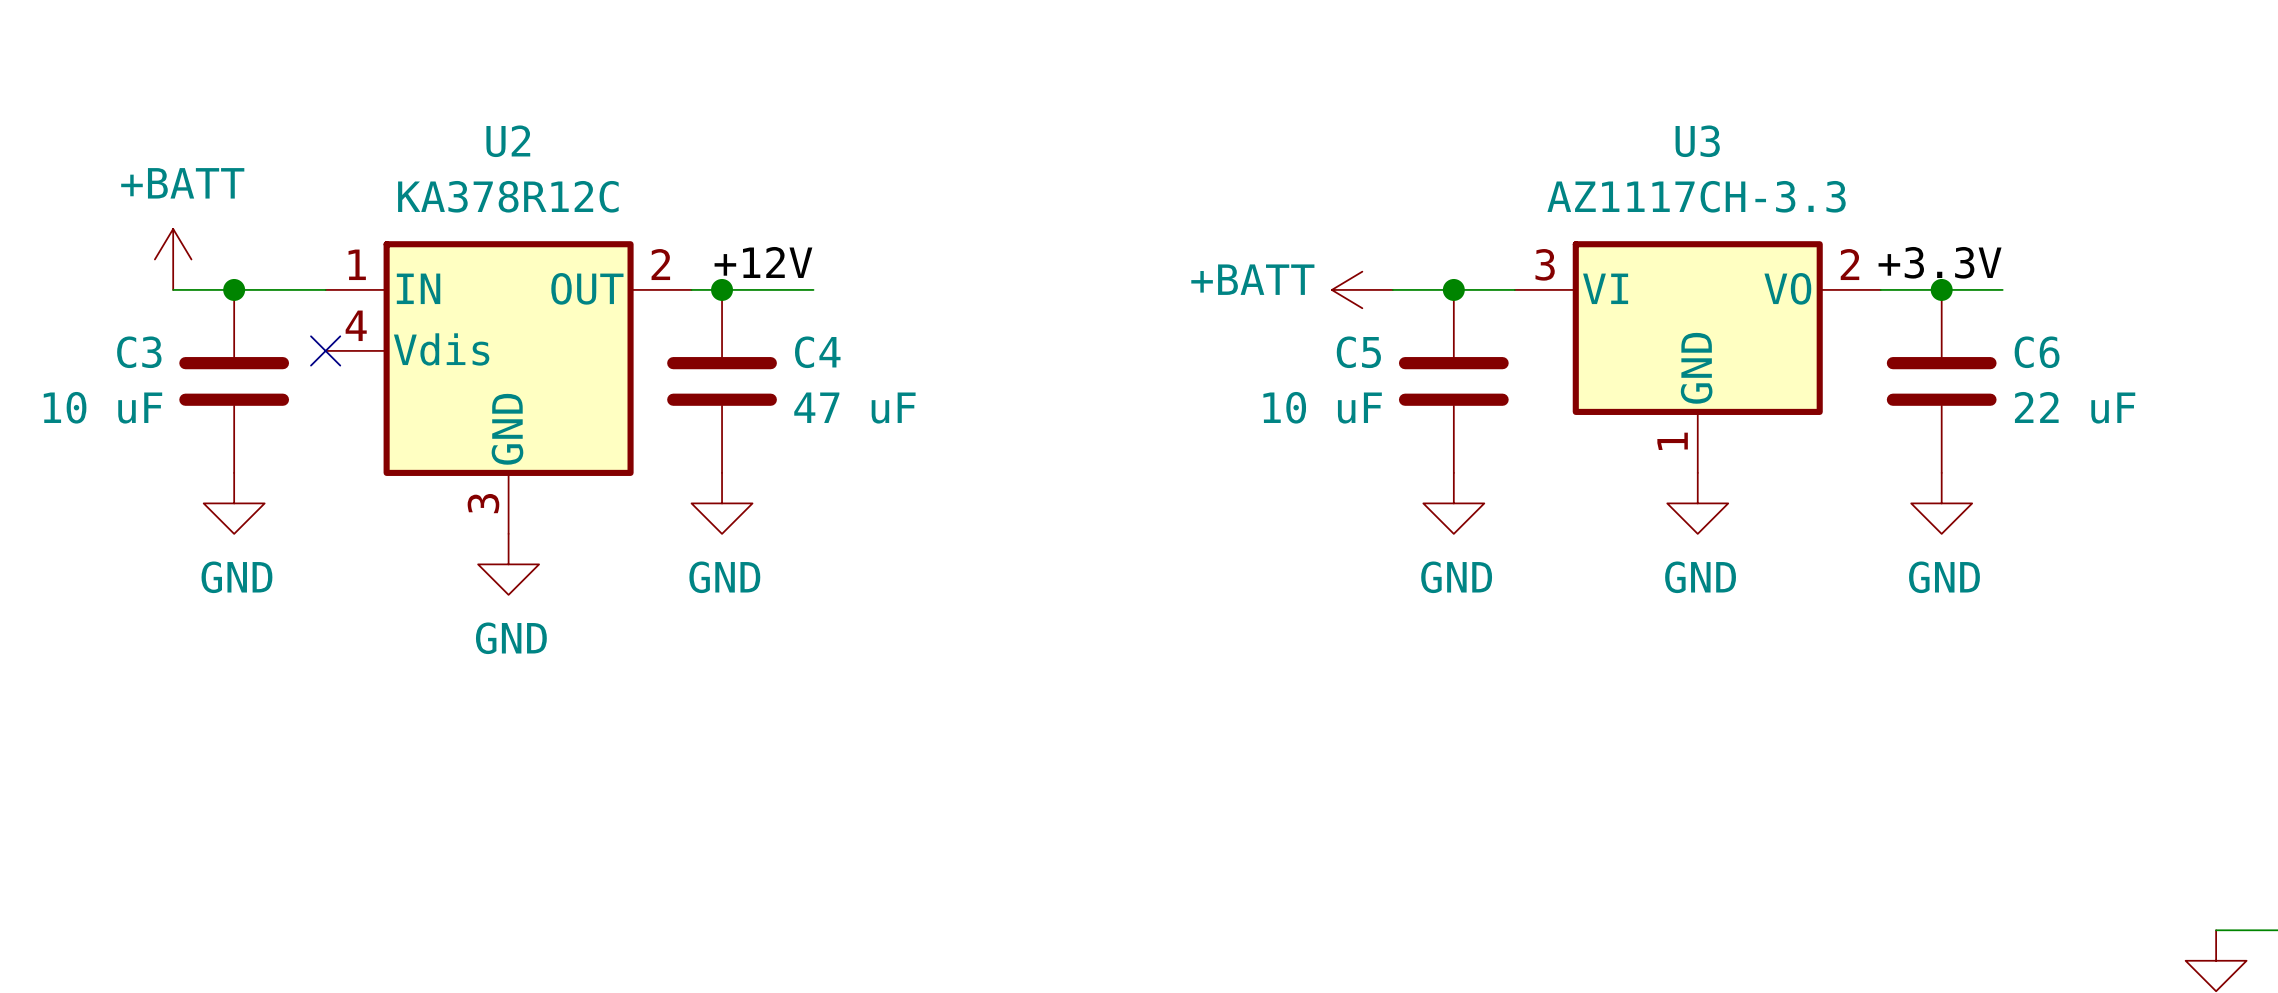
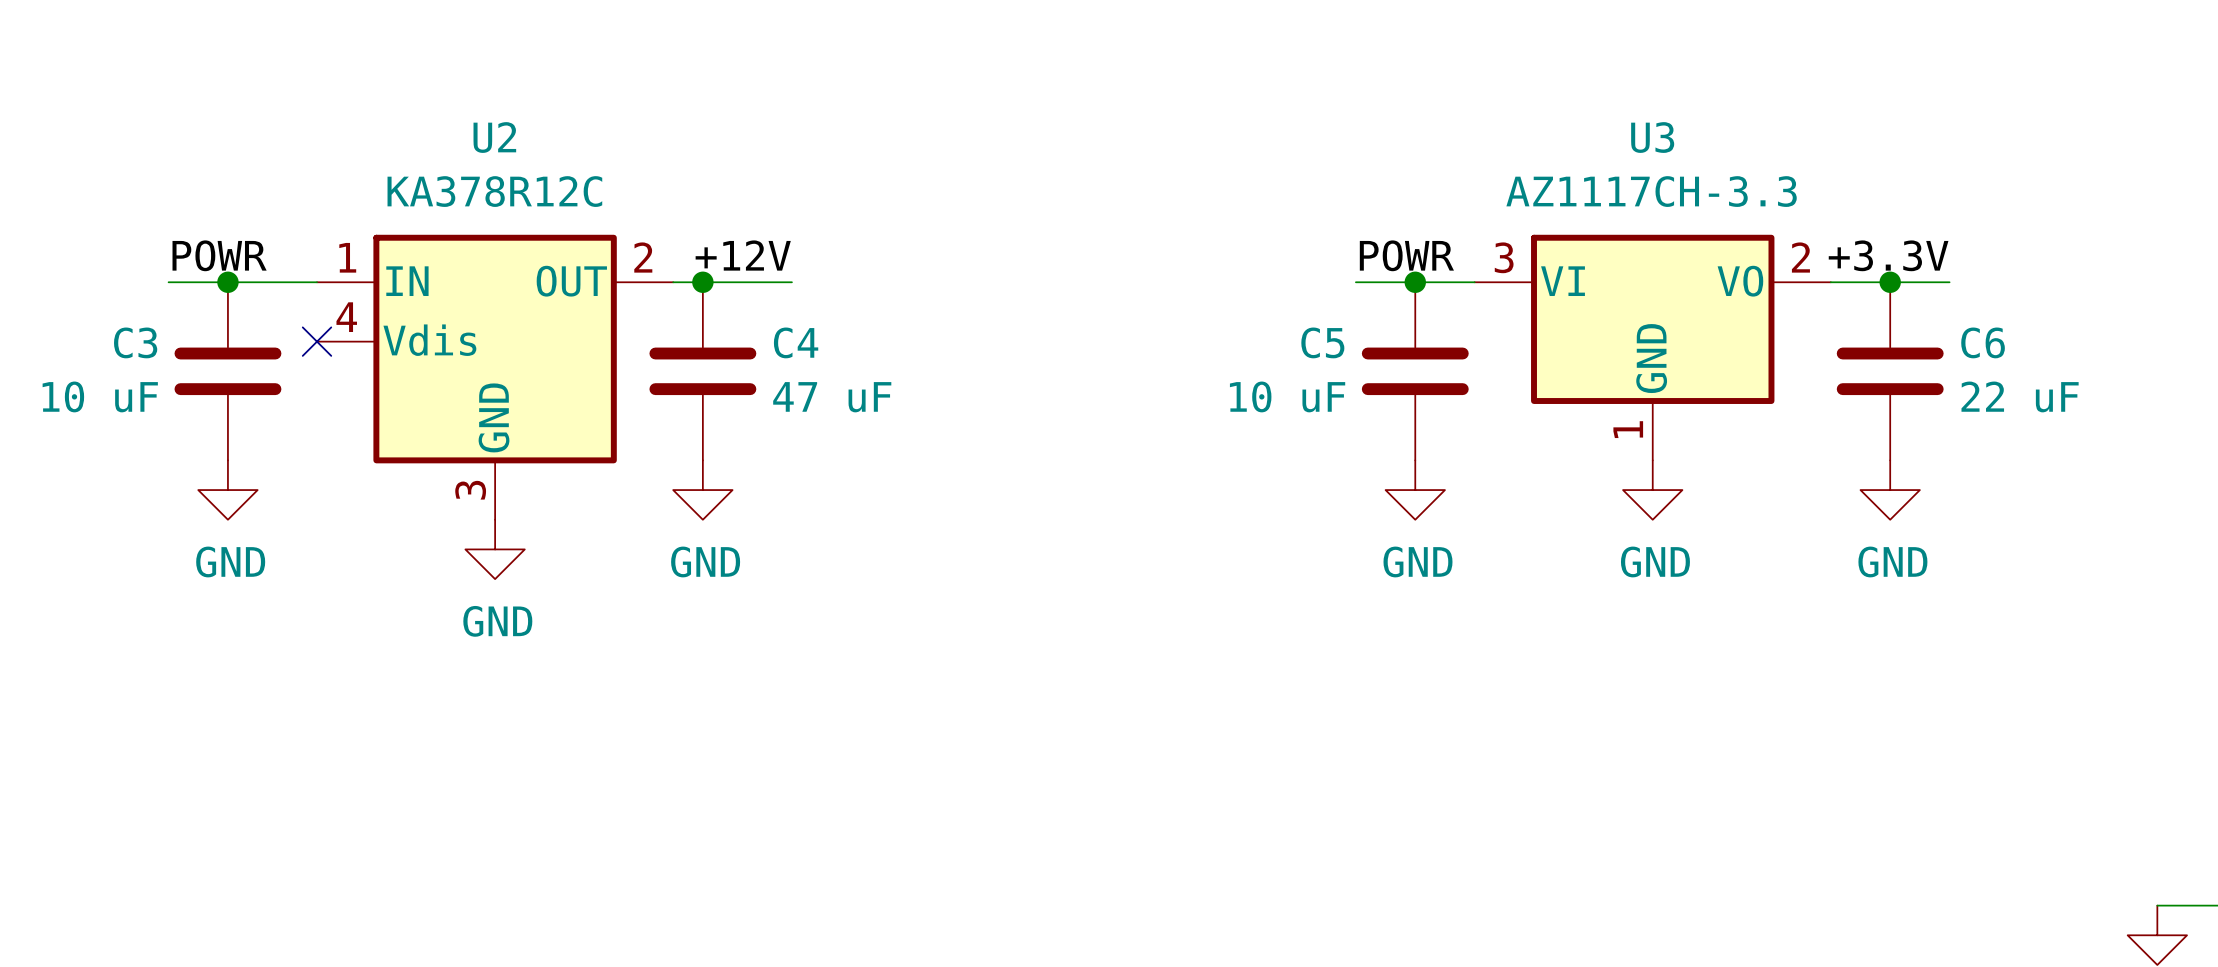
power symbol: +BATT (173, 259) -> none
label: none -> POWR (219, 255)
label: none -> POWR (1406, 255)
power symbol: +BATT (1362, 289) -> none

